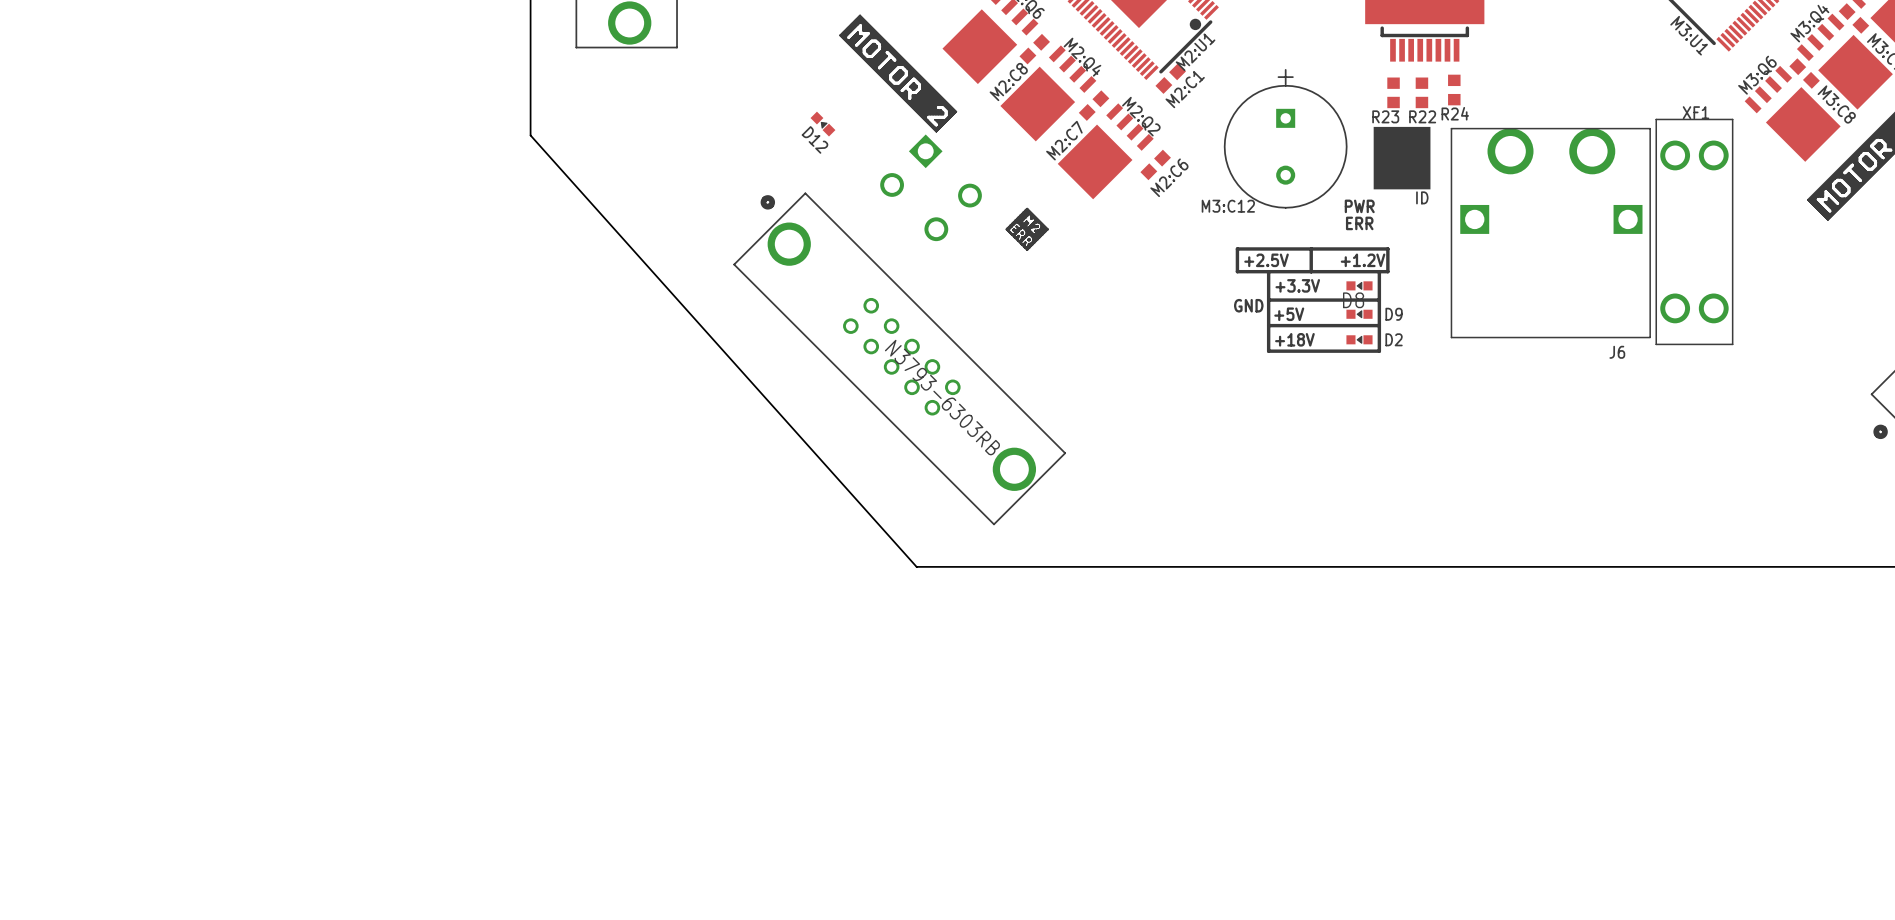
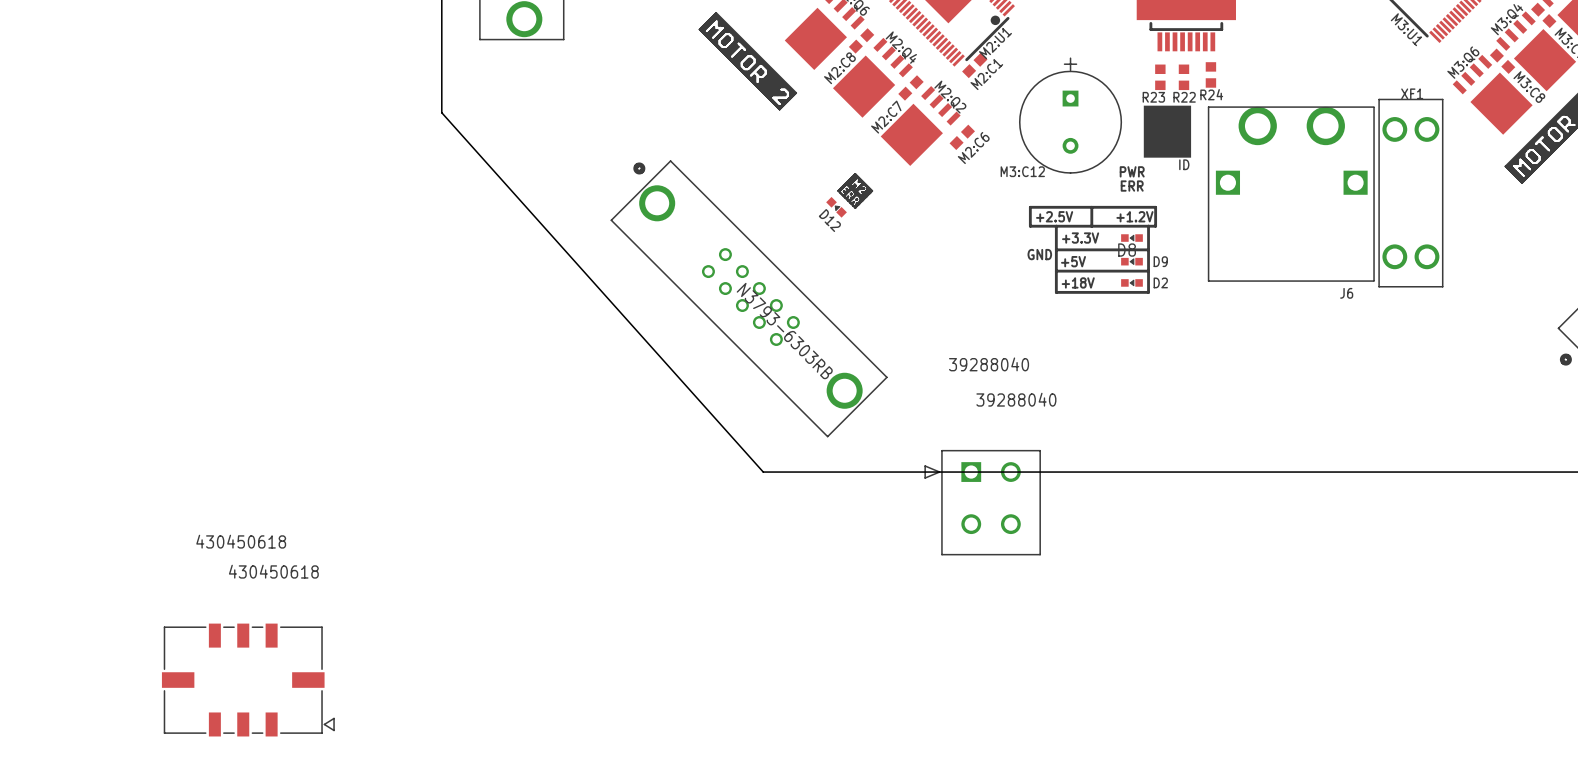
D12 position: (822, 124) -> (836, 207)
part: (931, 187) -> none
part: none -> 39288040 (982, 502)
part: none -> 430450618 (248, 680)

